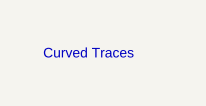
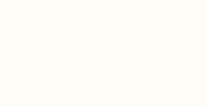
text: Curved Traces (88, 52) -> none

